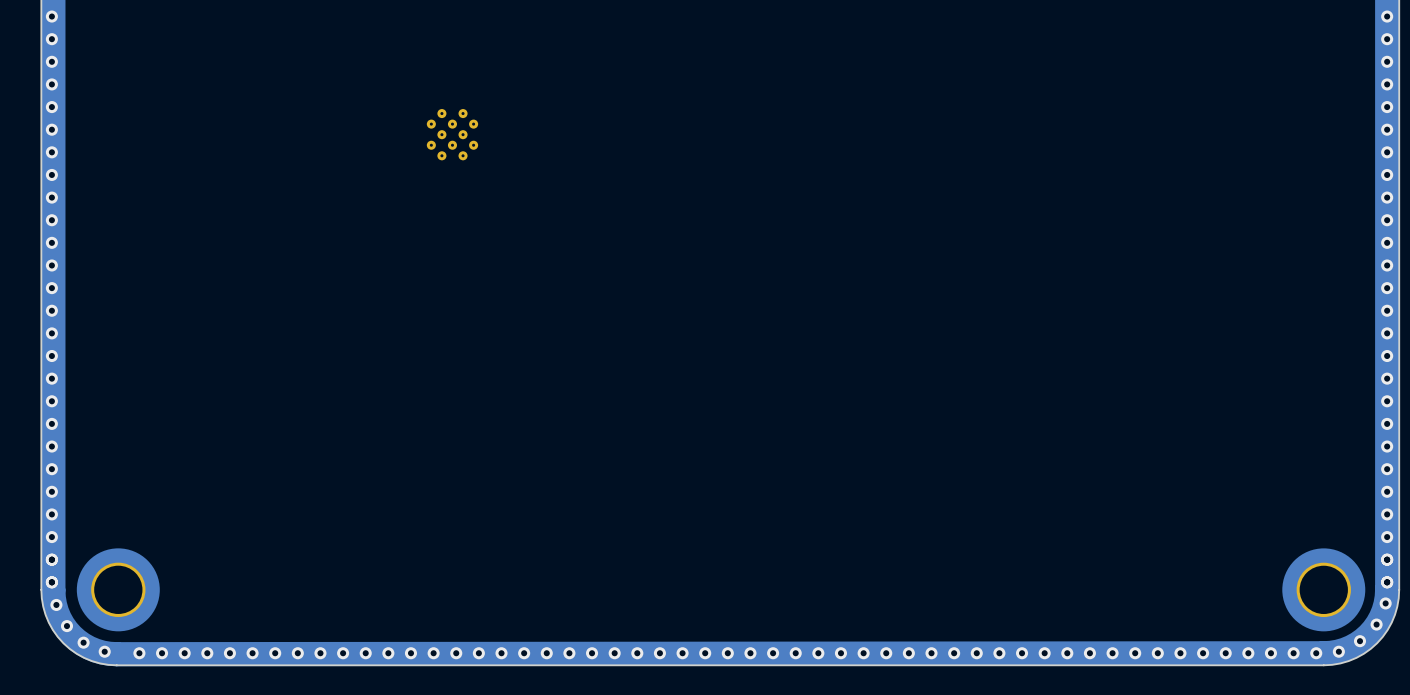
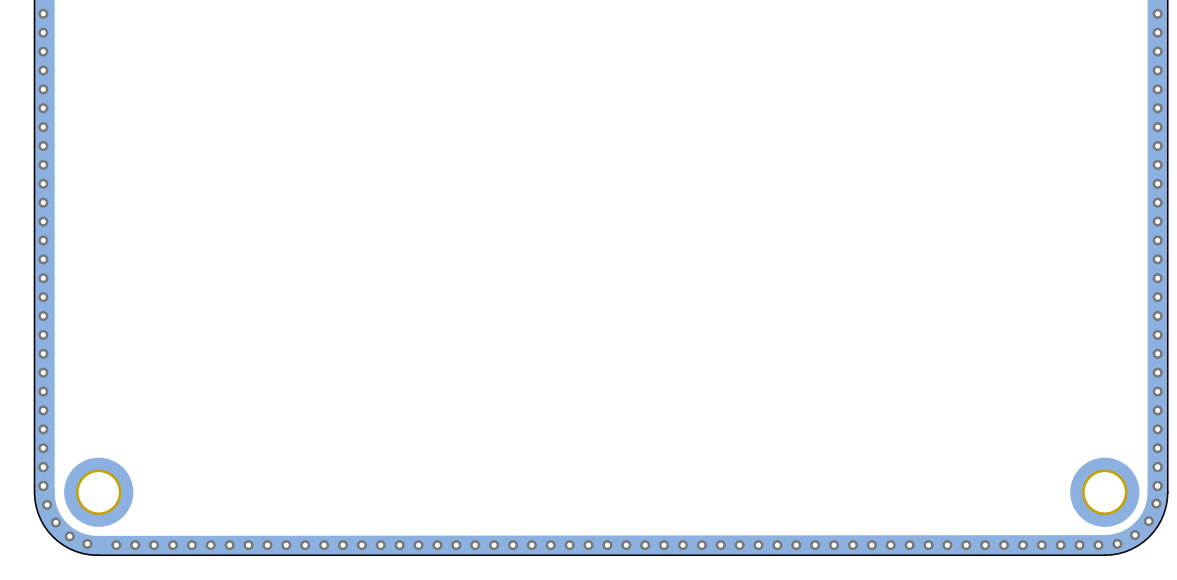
part: (452, 134) -> none

